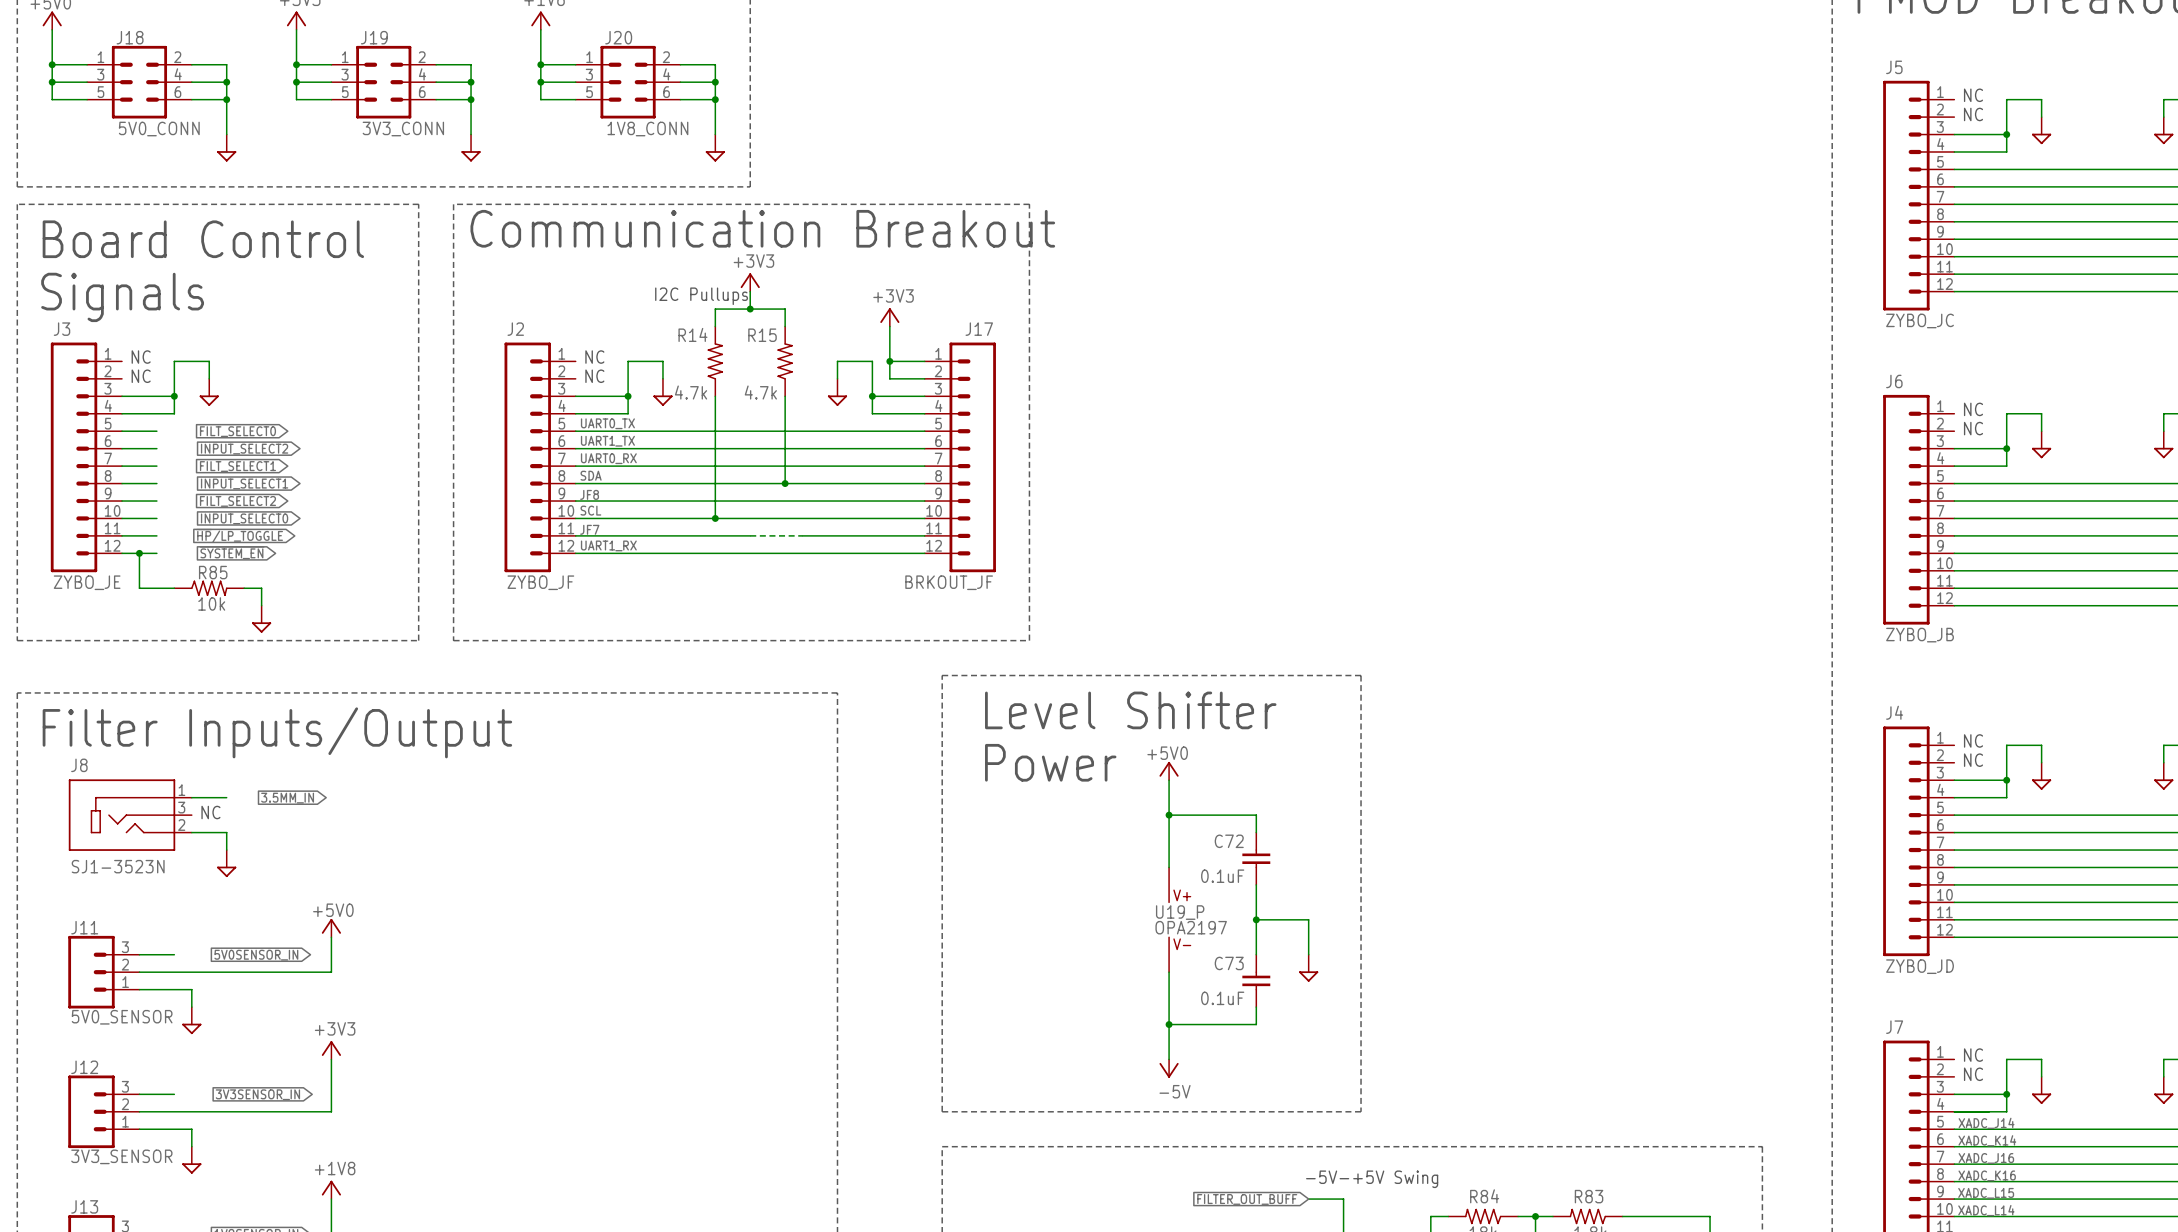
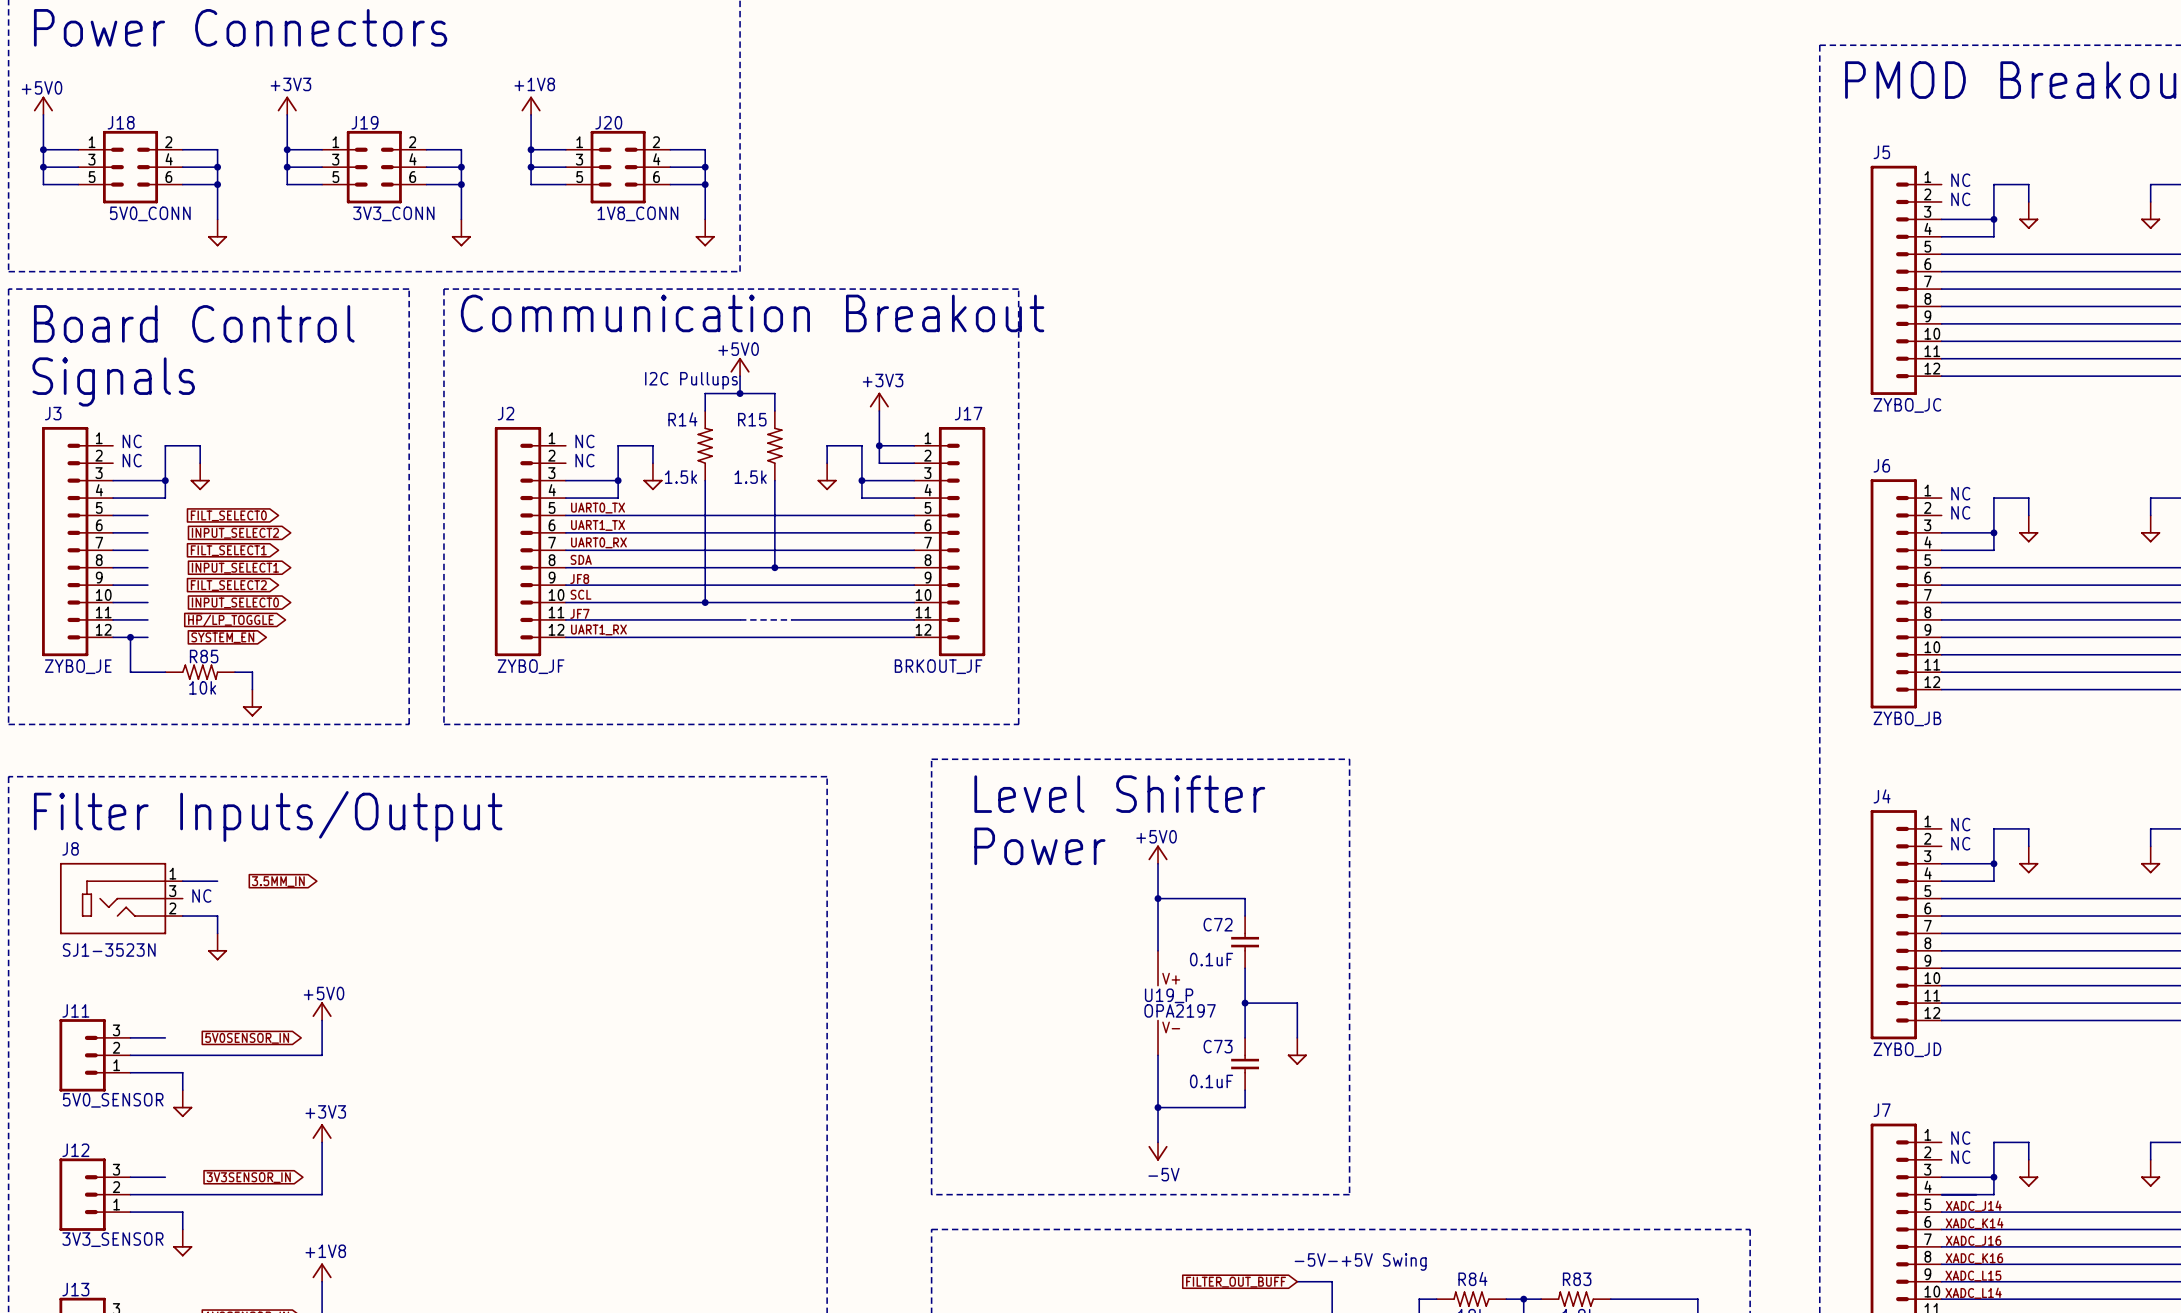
power symbol: +3V3 (750, 282) -> +5V0 (740, 366)
R14 value: 4.7k (691, 392) -> 1.5k (680, 477)
R15 value: 4.7k (760, 392) -> 1.5k (750, 477)

